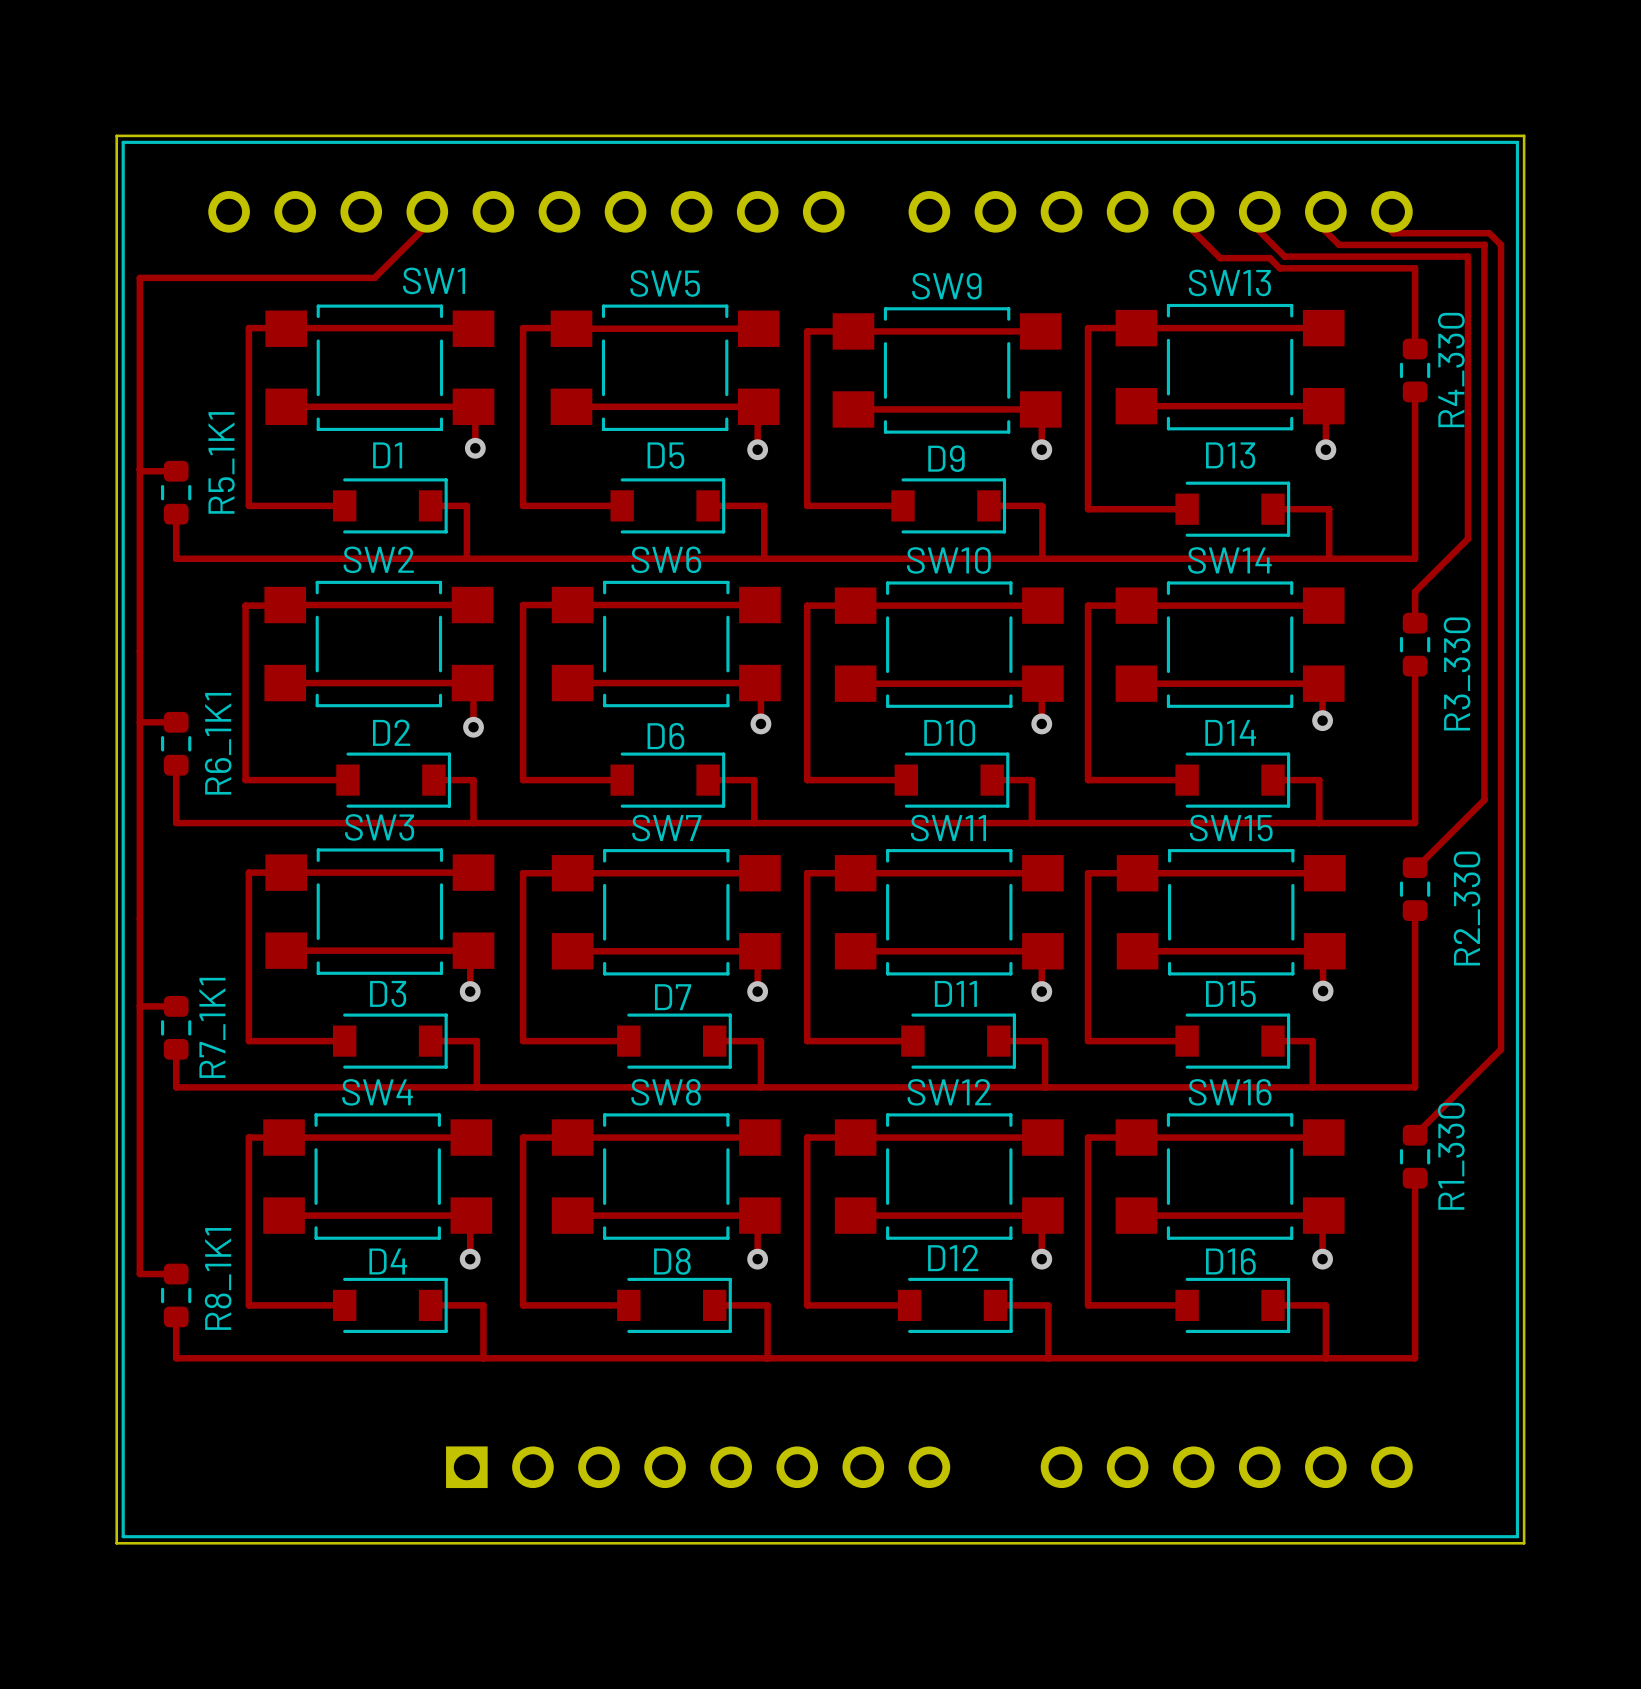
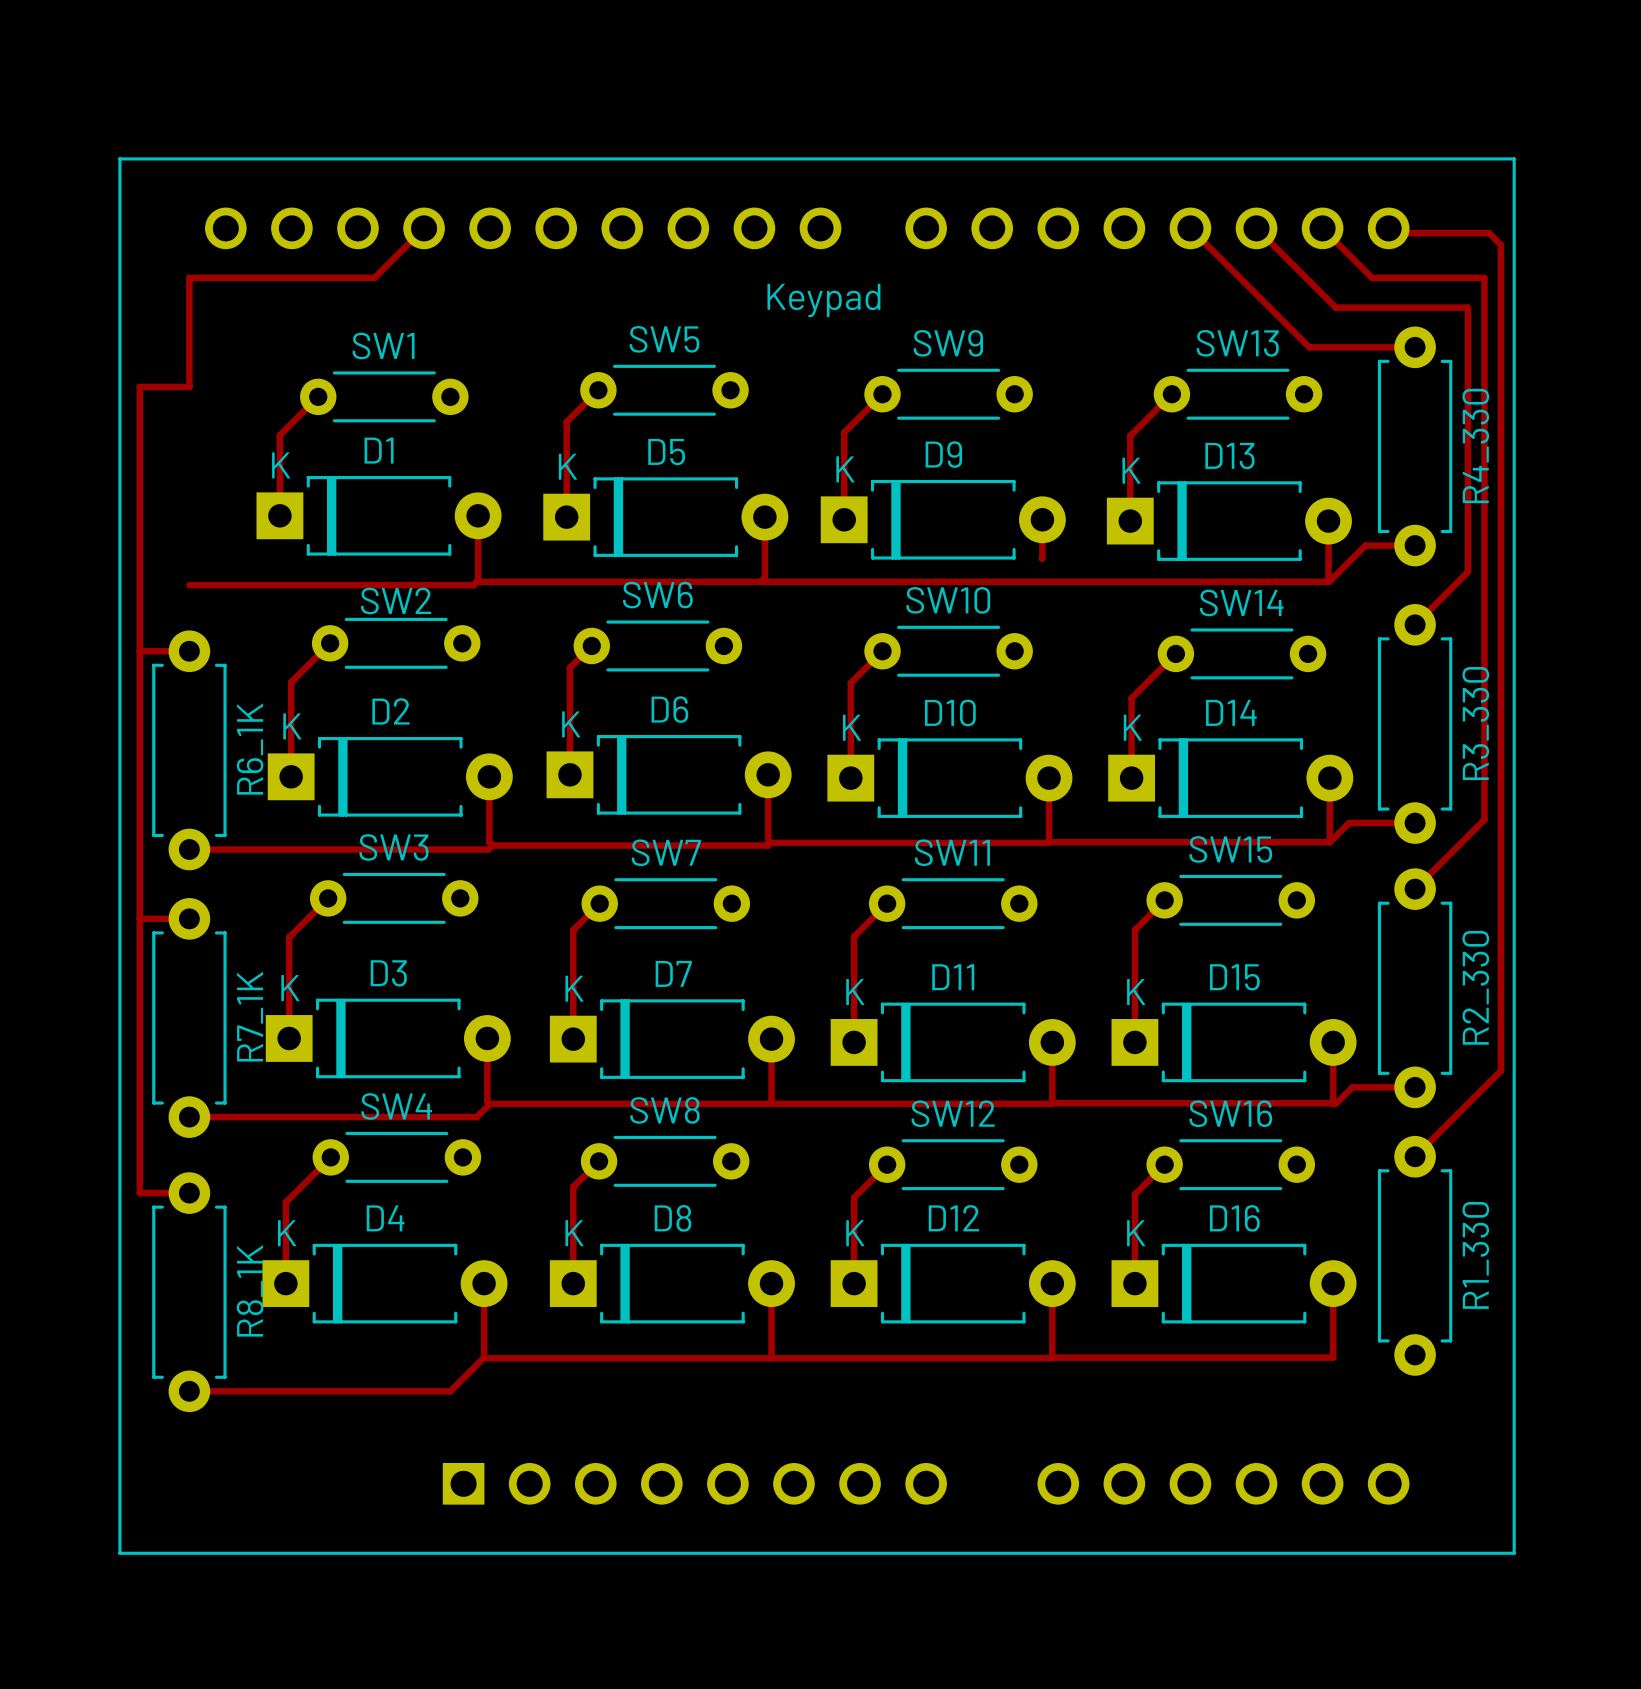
board edge: (116, 135) (1524, 135) (1524, 1543) (116, 1543) (116, 135) -> none
track: (1339, 244) (1484, 244) (1484, 277) -> (1339, 244) (1372, 277) (1484, 277)
track: (1284, 256) (1467, 256) (1467, 307) -> (1284, 256) (1335, 307) (1467, 307)
track: (1220, 258) (1269, 258) (1279, 268) (1415, 268) (1415, 347) -> (1220, 258) (1309, 347) (1415, 347)
track: (189, 277) (139, 277) (139, 386) -> (189, 277) (189, 386) (139, 386)
SW1 name position: SW1 (434, 280) -> SW1 (383, 345)
Keypad name: none -> Keypad (823, 300)
SW13 footprint: [1115, 303, 1345, 431] -> [1153, 368, 1323, 420]
SW1 footprint: [265, 304, 495, 431] -> [300, 371, 469, 423]
SW5 footprint: [550, 304, 780, 431] -> [580, 364, 749, 416]
SW9 footprint: [832, 307, 1062, 434] -> [864, 368, 1033, 420]
track: (475, 328) (248, 328) (248, 505) (344, 505) -> none
track: (571, 328) (523, 328) (523, 505) (622, 505) -> none
track: (575, 328) (763, 328) -> none
track: (1323, 328) (1088, 328) (1088, 509) (1187, 509) -> none
track: (1040, 331) (807, 331) (807, 505) (903, 505) -> none
R4_330 footprint: [1399, 338, 1431, 403] -> [1377, 326, 1453, 567]
track: none -> (598, 390) (566, 421) (566, 517)
track: (1415, 391) (1415, 558) (176, 558) (176, 514) -> none
track: none -> (882, 394) (844, 432) (844, 519)
track: none -> (1171, 394) (1130, 435) (1130, 521)
track: none -> (318, 396) (279, 435) (279, 515)
track: (286, 406) (473, 406) (475, 408) (475, 448) -> none
track: (571, 406) (758, 406) (757, 449) -> none
track: (1136, 406) (1323, 406) (1325, 408) (1325, 449) -> none
track: (853, 409) (1040, 409) (1041, 449) -> none
via: (475, 448) -> none
via: (757, 449) -> none
via: (1041, 449) -> none
via: (1325, 449) -> none
track: (139, 469) (141, 471) (176, 471) -> none
D1 footprint: [332, 478, 448, 534] -> [256, 476, 502, 556]
D5 footprint: [610, 478, 726, 534] -> [543, 477, 789, 557]
D9 footprint: [891, 478, 1007, 534] -> [820, 479, 1066, 560]
D13 footprint: [1175, 481, 1291, 537] -> [1106, 481, 1352, 561]
R5_1K1: (176, 492) -> none
track: (430, 505) (466, 505) (466, 558) -> none
track: (708, 505) (764, 505) (764, 558) -> none
track: (988, 505) (1041, 505) (1042, 519) -> none
track: (1273, 509) (1329, 509) (1329, 558) -> none
track: none -> (478, 515) (478, 580) (473, 585) (189, 585)
track: none -> (764, 517) (764, 577) (760, 581)
track: none -> (1328, 521) (1329, 581)
track: (1467, 538) (1415, 591) (1415, 624) -> (1467, 538) (1467, 571) (1415, 624)
track: none -> (1415, 545) (1365, 545) (1329, 581)
SW2 footprint: [264, 580, 494, 708] -> [311, 617, 481, 669]
SW6 footprint: [551, 580, 781, 708] -> [573, 620, 743, 672]
track: none -> (476, 581) (1329, 581)
SW10 footprint: [834, 581, 1064, 708] -> [864, 625, 1033, 677]
SW14 footprint: [1115, 581, 1345, 708] -> [1157, 628, 1327, 680]
track: (284, 605) (245, 605) (245, 780) (347, 780) -> none
track: (285, 605) (472, 605) -> none
track: (759, 605) (523, 605) (523, 780) (622, 780) -> none
track: (1042, 605) (807, 605) (807, 780) (906, 780) -> none
track: (1323, 605) (1088, 605) (1088, 780) (1187, 780) -> none
R3_330 footprint: [1399, 612, 1431, 677] -> [1377, 604, 1453, 844]
track: none -> (330, 643) (291, 682) (291, 776)
track: none -> (591, 645) (569, 667) (569, 774)
track: none -> (139, 651) (189, 651)
track: none -> (882, 651) (850, 682) (850, 778)
track: none -> (1175, 653) (1131, 698) (1131, 778)
track: (1415, 666) (1415, 823) -> none
track: (285, 683) (472, 683) (473, 727) -> none
track: (572, 683) (759, 683) (760, 723) -> none
track: (855, 683) (1042, 683) (1041, 723) -> none
track: (1136, 683) (1323, 683) (1322, 720) -> none
via: (1322, 720) -> none
track: (139, 722) (176, 722) -> none
via: (760, 723) -> none
via: (1041, 723) -> none
via: (473, 727) -> none
R6_1K1: (176, 743) -> none
R6_1K: none -> (189, 750)
D2 footprint: [336, 752, 452, 808] -> [267, 737, 513, 817]
D6 footprint: [610, 752, 726, 808] -> [546, 735, 792, 815]
D10 footprint: [894, 752, 1010, 808] -> [827, 738, 1073, 818]
D14 footprint: [1175, 752, 1291, 808] -> [1108, 738, 1354, 818]
track: (176, 765) (176, 823) (1349, 823) -> (1329, 842) (1349, 823)
track: none -> (768, 774) (768, 845)
track: none -> (489, 776) (489, 842) (492, 845)
track: none -> (1049, 778) (1049, 842)
track: none -> (1329, 778) (1329, 842)
track: (433, 780) (473, 780) (473, 823) -> none
track: (708, 780) (754, 780) (754, 823) -> none
track: (992, 780) (1031, 780) (1031, 823) -> none
track: (1273, 780) (1319, 780) (1319, 823) -> none
track: (1484, 799) (1415, 869) -> (1484, 799) (1484, 819) (1415, 889)
Keypad position: (820, 839) -> (817, 856)
track: none -> (1049, 842) (770, 842) (768, 845)
track: none -> (1049, 842) (1329, 842)
track: none -> (492, 845) (488, 849) (189, 849)
track: none -> (492, 845) (768, 845)
SW3 footprint: [265, 848, 495, 975] -> [309, 872, 479, 924]
SW7 footprint: [551, 849, 781, 976] -> [581, 878, 751, 930]
SW11 footprint: [834, 849, 1064, 976] -> [868, 878, 1038, 930]
SW15 footprint: [1116, 849, 1346, 976] -> [1146, 874, 1316, 926]
R2_330 footprint: [1399, 857, 1431, 922] -> [1377, 868, 1453, 1109]
track: (473, 872) (248, 872) (248, 1041) (344, 1041) -> none
track: (759, 873) (523, 873) (523, 1041) (628, 1041) -> none
track: (1042, 873) (807, 873) (807, 1041) (912, 1041) -> none
track: (1324, 873) (1088, 873) (1088, 1041) (1187, 1041) -> none
track: none -> (328, 898) (289, 937) (289, 1038)
track: none -> (1164, 900) (1134, 930) (1134, 1042)
track: none -> (599, 903) (573, 930) (573, 1039)
track: none -> (887, 903) (854, 936) (854, 1042)
track: (1415, 910) (1415, 1087) -> none
track: none -> (139, 918) (189, 918)
track: (286, 950) (473, 950) (470, 953) (470, 991) -> none
track: (572, 951) (759, 951) (757, 953) (757, 991) -> none
track: (855, 951) (1042, 951) (1041, 991) -> none
track: (1137, 951) (1324, 951) (1323, 953) (1323, 991) -> none
via: (470, 991) -> none
via: (757, 991) -> none
via: (1041, 991) -> none
via: (1323, 991) -> none
track: (139, 1006) (176, 1006) -> none
D3 footprint: [332, 1013, 448, 1069] -> [265, 998, 511, 1079]
D7 footprint: [617, 1013, 732, 1069] -> [549, 999, 795, 1079]
D11 footprint: [901, 1013, 1016, 1069] -> [830, 1002, 1076, 1083]
D15 footprint: [1175, 1013, 1291, 1069] -> [1111, 1002, 1357, 1083]
R7_1K: none -> (189, 1017)
R7_1K1: (176, 1027) -> none
track: none -> (487, 1038) (487, 1101) (490, 1103)
track: none -> (771, 1039) (770, 1103)
track: (430, 1041) (476, 1041) (476, 1087) -> none
track: (714, 1041) (760, 1041) (760, 1087) -> none
track: (998, 1041) (1045, 1041) (1045, 1087) -> none
track: (1273, 1041) (1312, 1041) (1312, 1087) -> none
track: none -> (1052, 1042) (1052, 1103)
track: none -> (1333, 1042) (1332, 1103) (1052, 1103)
track: (176, 1049) (176, 1087) (1352, 1087) -> (1335, 1103) (1352, 1087)
track: (1500, 1049) (1415, 1135) -> (1500, 1049) (1500, 1070) (1415, 1156)
track: none -> (490, 1103) (476, 1117) (189, 1117)
track: none -> (1052, 1103) (490, 1103)
SW4 footprint: [263, 1113, 493, 1240] -> [312, 1131, 482, 1183]
SW8 footprint: [551, 1113, 781, 1240] -> [580, 1135, 750, 1187]
SW12 footprint: [834, 1113, 1064, 1240] -> [868, 1139, 1038, 1191]
SW16 footprint: [1115, 1113, 1345, 1240] -> [1146, 1139, 1316, 1191]
R1_330 footprint: [1399, 1124, 1431, 1189] -> [1377, 1135, 1453, 1376]
track: (471, 1137) (248, 1137) (248, 1305) (344, 1305) -> none
track: (759, 1137) (523, 1137) (523, 1305) (628, 1305) -> none
track: (1042, 1137) (807, 1137) (807, 1305) (909, 1305) -> none
track: (1323, 1137) (1088, 1137) (1088, 1305) (1187, 1305) -> none
track: none -> (330, 1157) (285, 1202) (285, 1283)
track: none -> (599, 1161) (573, 1187) (573, 1283)
track: none -> (887, 1164) (854, 1197) (854, 1283)
track: none -> (1164, 1164) (1134, 1194) (1134, 1283)
track: (1415, 1178) (1415, 1358) (1051, 1358) -> none
track: (139, 1193) (139, 1274) (176, 1274) -> (139, 1193) (189, 1193)
track: (284, 1215) (471, 1215) (470, 1259) -> none
track: (572, 1215) (759, 1215) (757, 1217) (757, 1259) -> none
track: (855, 1215) (1042, 1215) (1041, 1259) -> none
track: (1136, 1215) (1323, 1215) (1322, 1259) -> none
via: (470, 1259) -> none
via: (757, 1259) -> none
via: (1041, 1259) -> none
via: (1322, 1259) -> none
D4 footprint: [332, 1277, 448, 1333] -> [262, 1243, 508, 1324]
D8 footprint: [617, 1277, 732, 1333] -> [549, 1243, 795, 1324]
D12 footprint: [897, 1277, 1013, 1333] -> [830, 1243, 1076, 1324]
D16 footprint: [1175, 1277, 1291, 1333] -> [1111, 1243, 1357, 1324]
track: none -> (484, 1283) (484, 1357) (450, 1391) (189, 1391)
track: none -> (771, 1283) (770, 1358)
track: none -> (1052, 1283) (1052, 1357) (1333, 1357) (1333, 1283)
R8_1K: none -> (189, 1292)
R8_1K1: (176, 1295) -> none
track: (430, 1305) (483, 1305) (483, 1358) (176, 1358) (176, 1316) -> none
track: (714, 1305) (767, 1305) (767, 1358) -> none
track: (995, 1305) (1048, 1305) (1048, 1358) -> none
track: (1273, 1305) (1325, 1305) (1325, 1358) -> none

